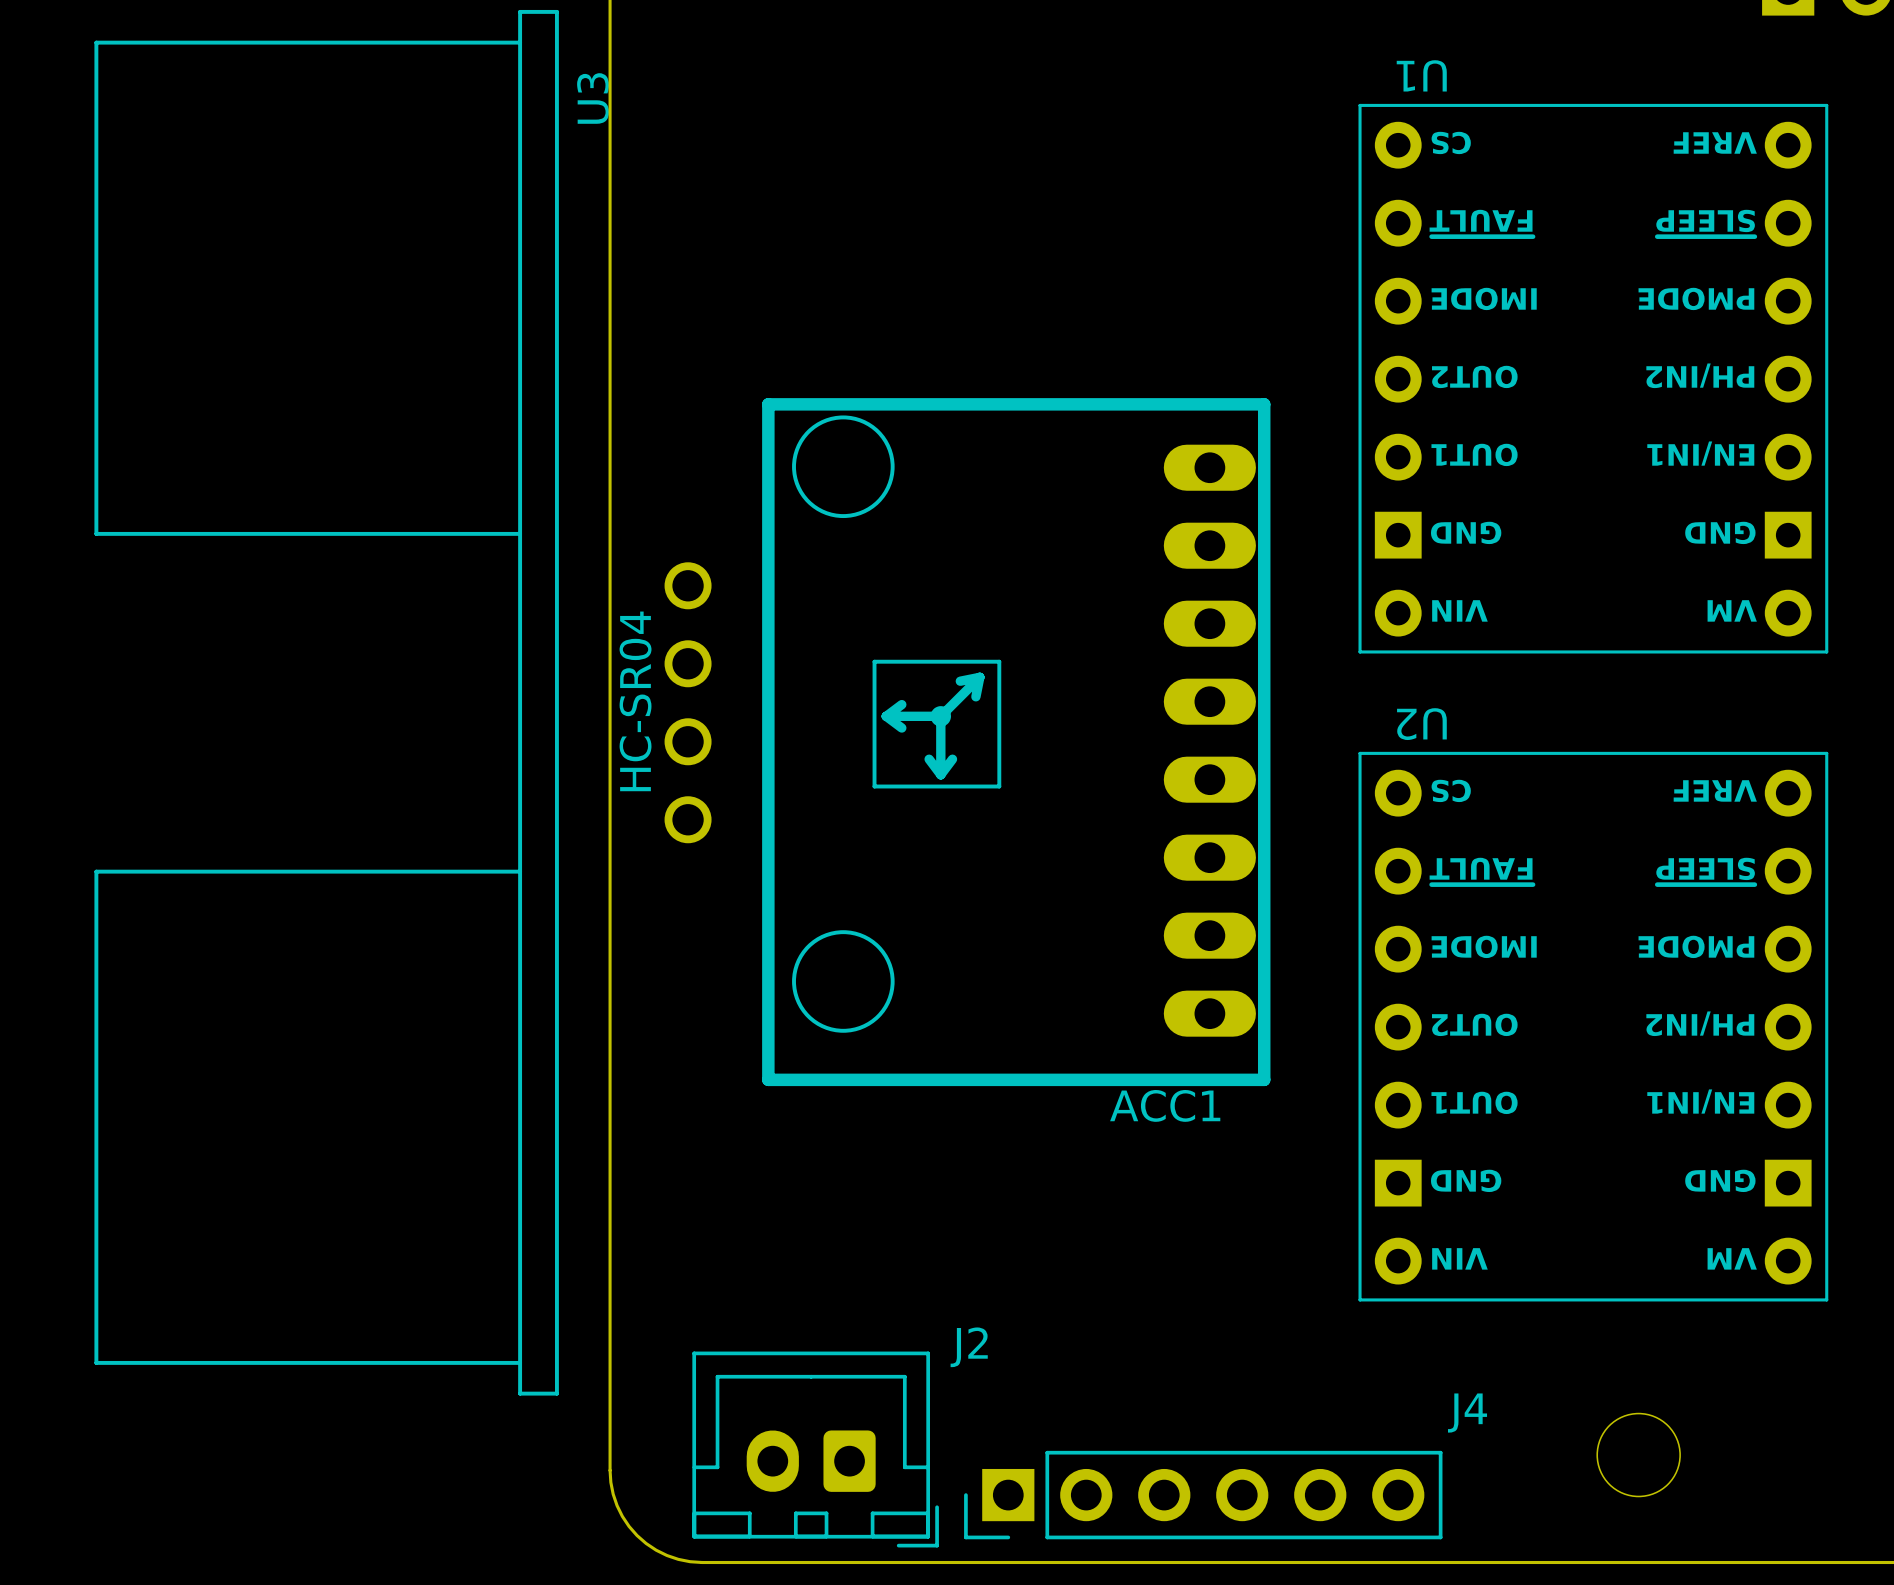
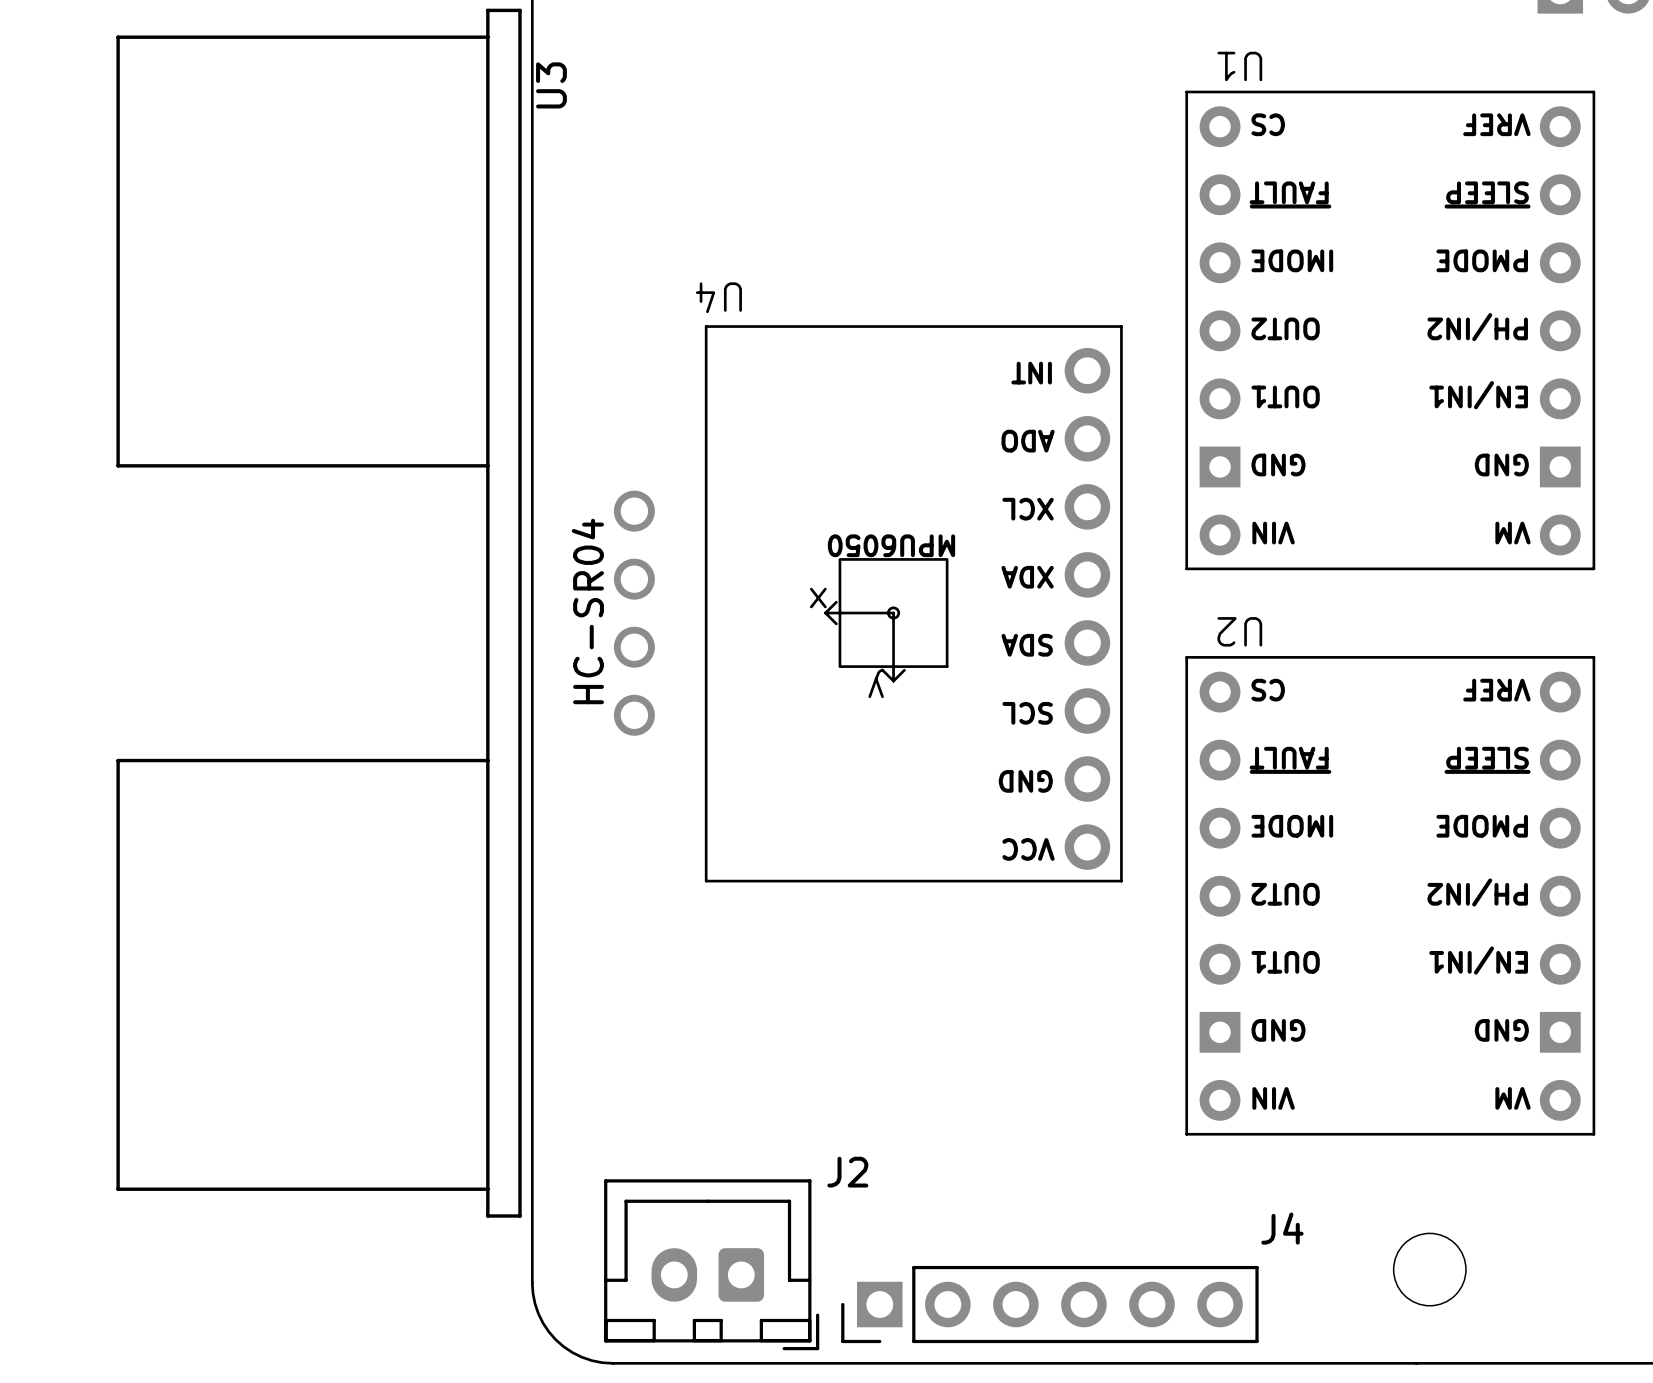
U4: none -> (913, 603)
U3 position: (402, 702) -> (385, 613)
ACC1: (1016, 742) -> none

